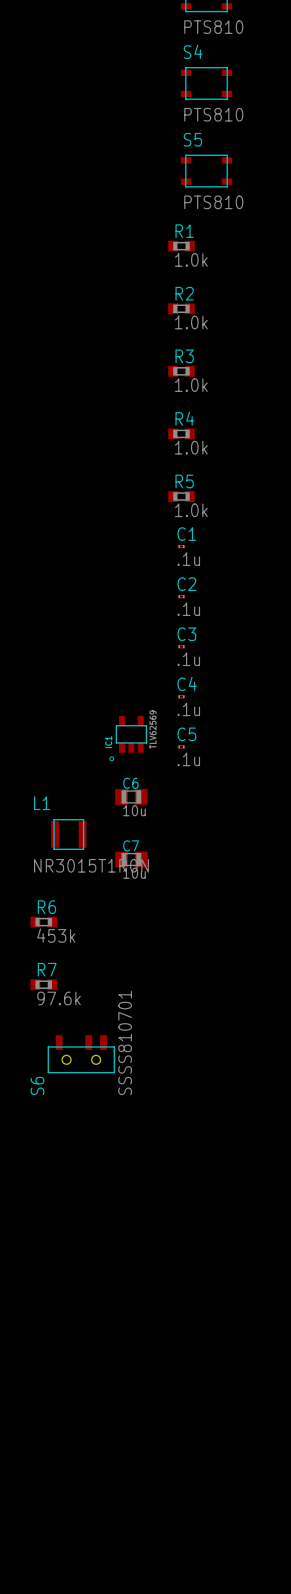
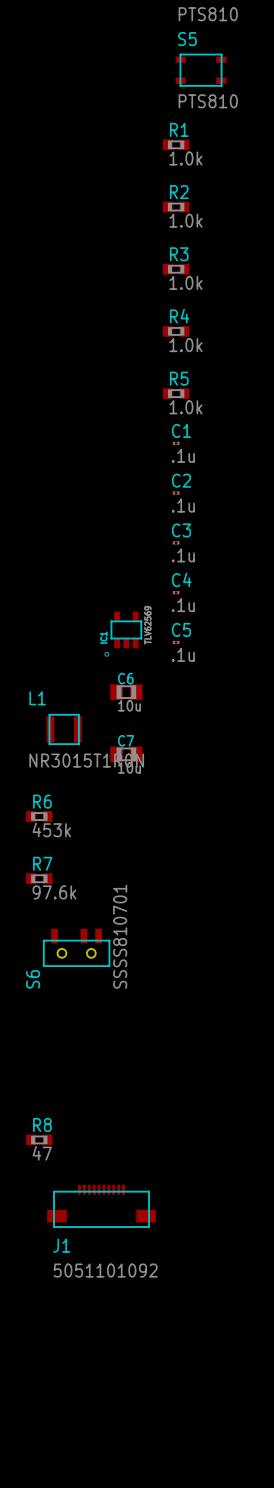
R8: none -> 47 (39, 1139)
J1: none -> 5051101092 (101, 1206)

